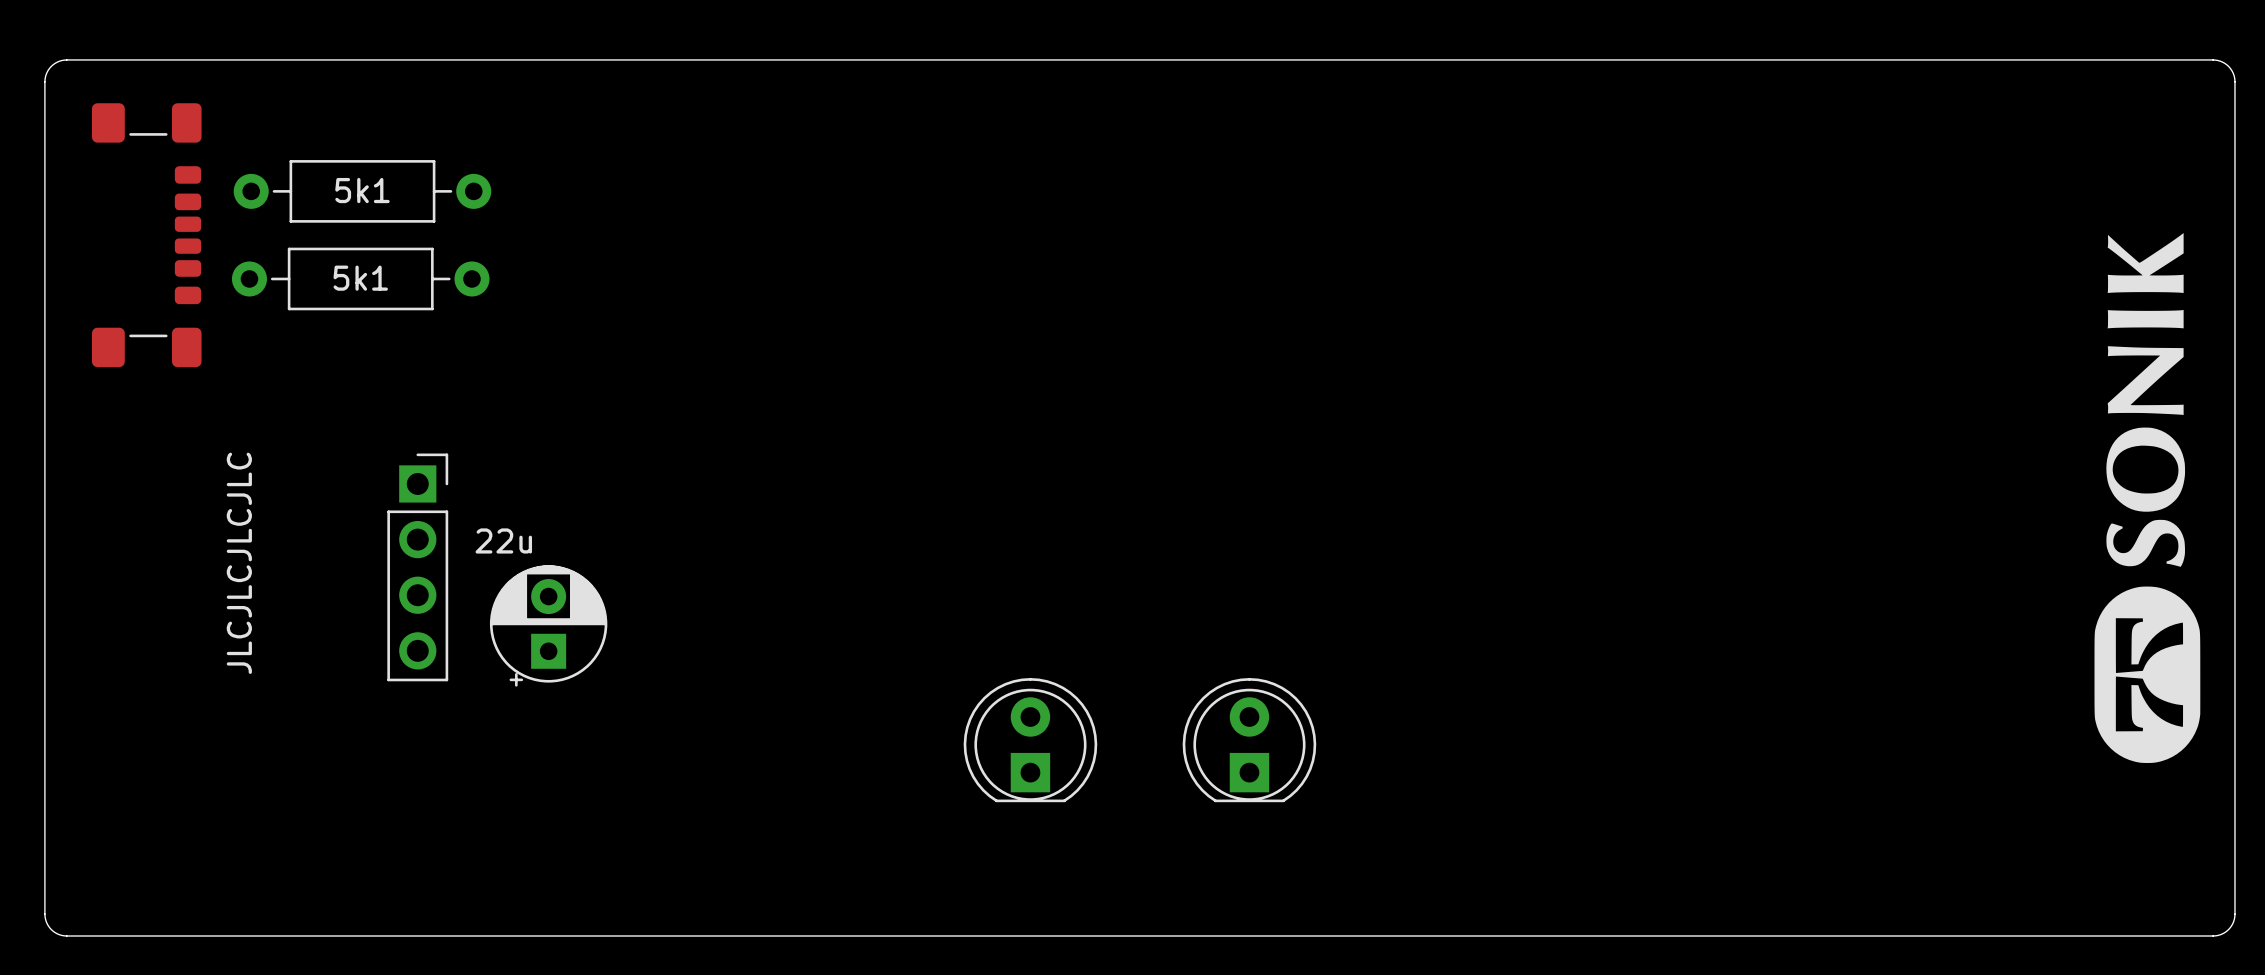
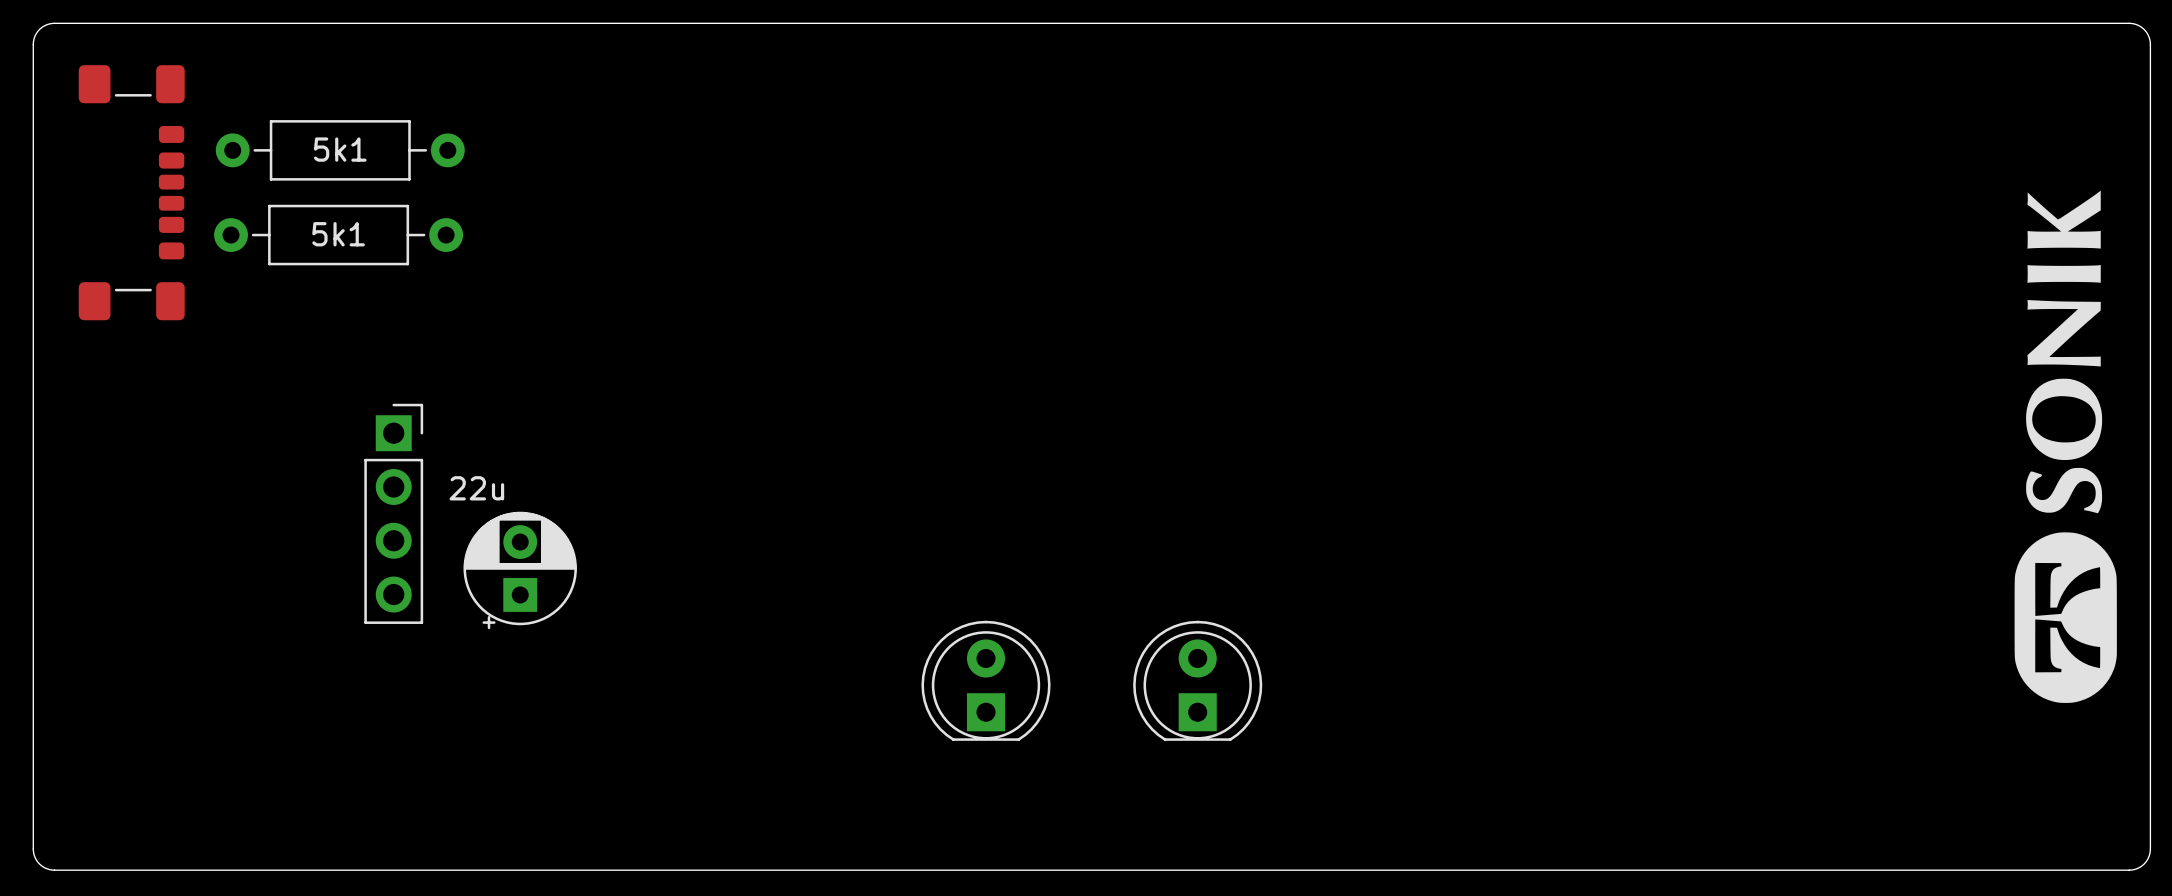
text: JLCJLCJLCJLC (239, 563) -> none

